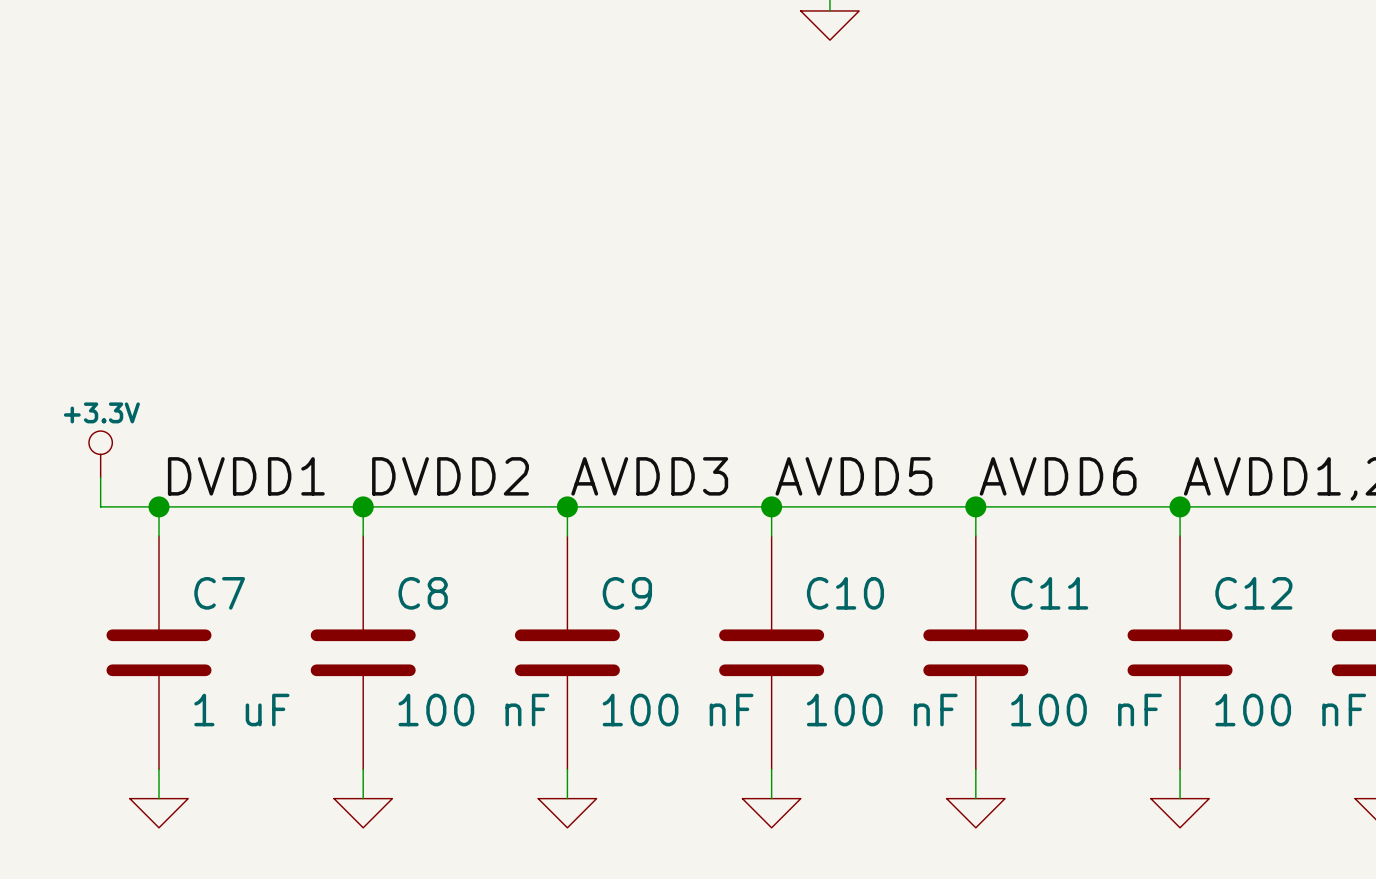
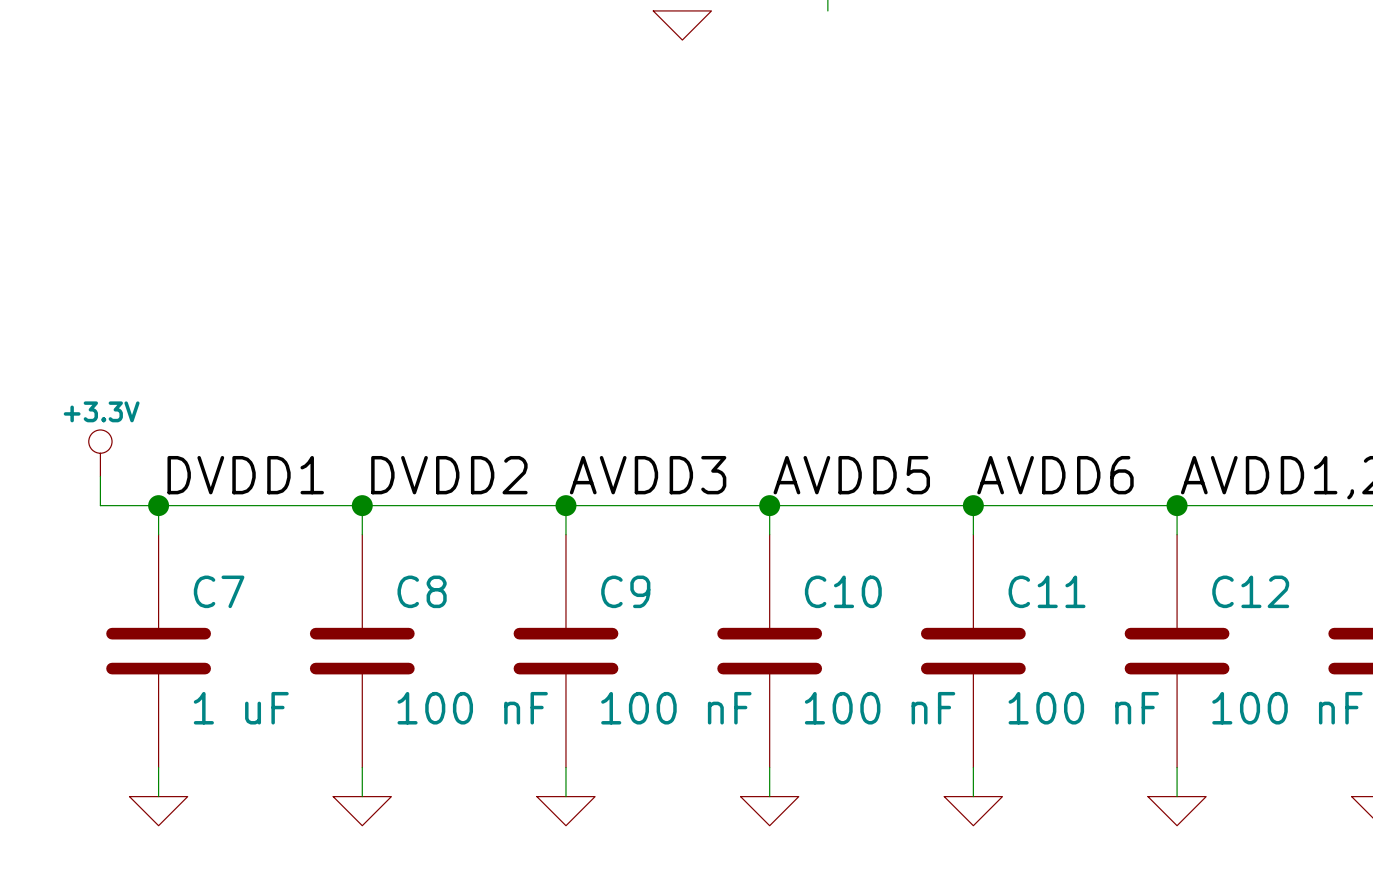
power symbol position: (829, 25) -> (682, 25)

